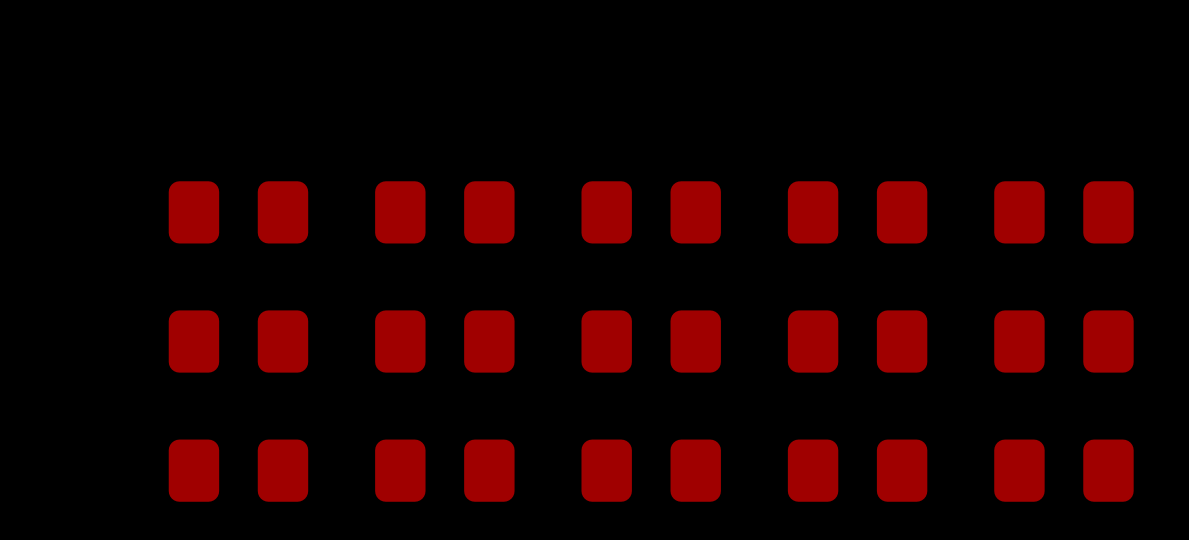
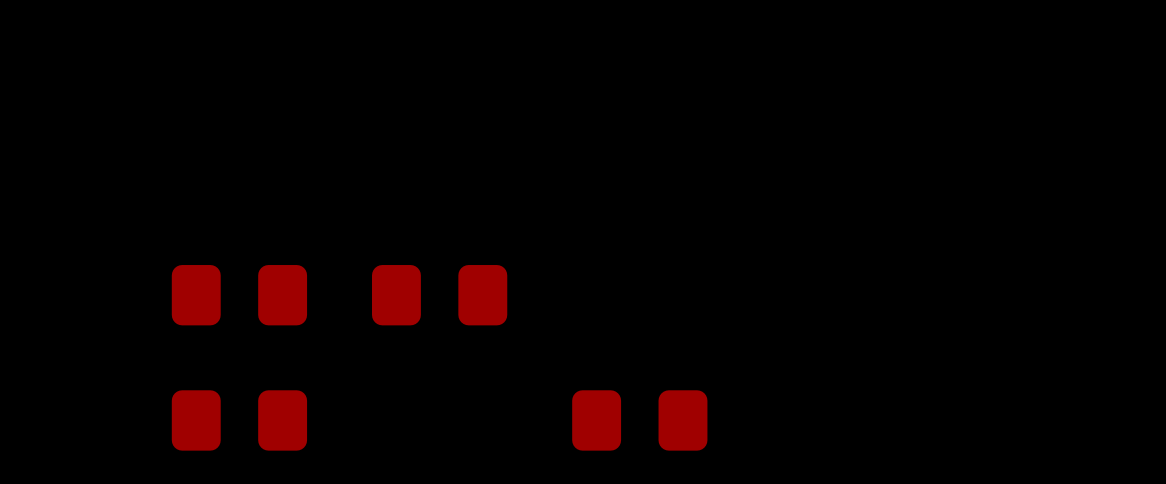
part: (238, 212) -> none
part: (444, 212) -> none
part: (651, 212) -> none
part: (857, 212) -> none
part: (1063, 212) -> none
part: (651, 341) -> none
part: (857, 341) -> none
part: (1063, 341) -> none
part: (444, 470) -> none
part: (857, 470) -> none
part: (1063, 470) -> none

